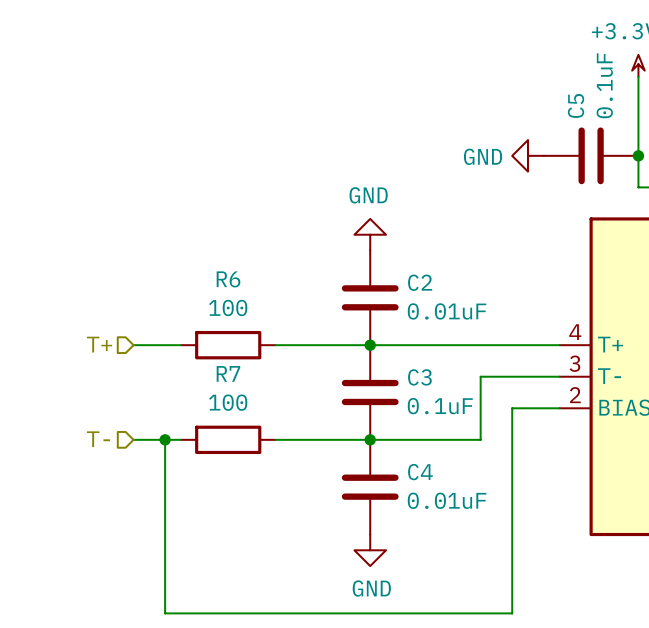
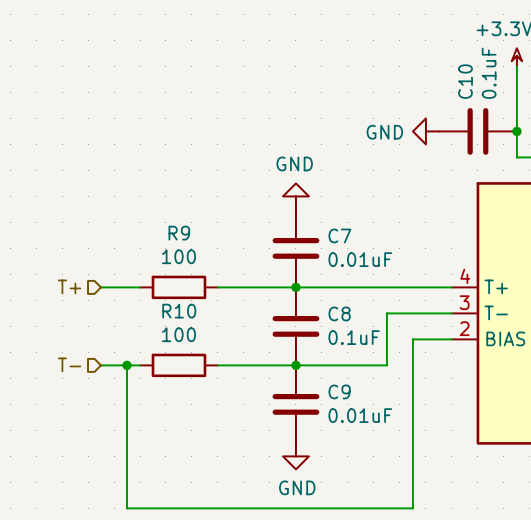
C5 name: C5 (576, 105) -> C10 (465, 81)
R6 name: R6 (228, 279) -> R9 (179, 233)
C2 name: C2 (420, 282) -> C7 (339, 235)
R7 name: R7 (228, 373) -> R10 (179, 311)
C3 name: C3 (419, 377) -> C8 (339, 313)
C4 name: C4 (420, 472) -> C9 (339, 391)

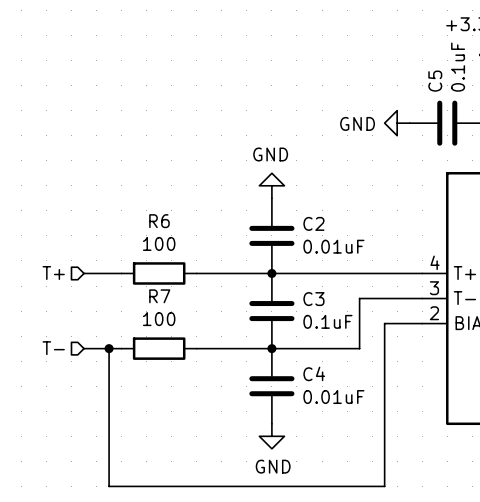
C10 name: C10 (465, 81) -> C5 (435, 81)
R9 name: R9 (179, 233) -> R6 (159, 221)
C7 name: C7 (339, 235) -> C2 (313, 223)
R10 name: R10 (179, 311) -> R7 (159, 296)
C8 name: C8 (339, 313) -> C3 (313, 299)
C9 name: C9 (339, 391) -> C4 (314, 373)

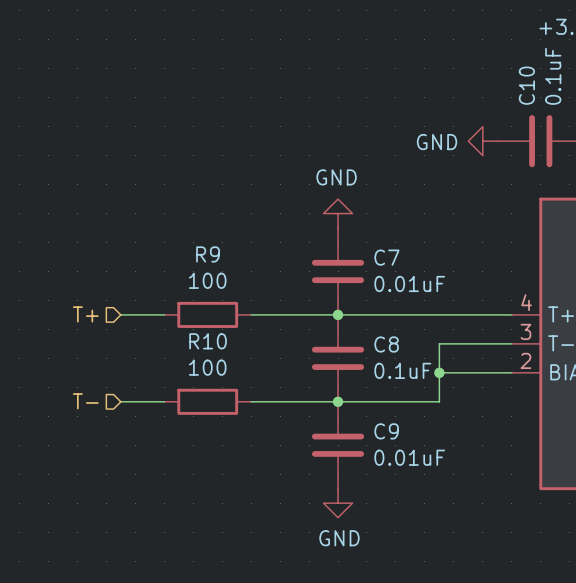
C5 name: C5 (435, 81) -> C10 (526, 85)
R6 name: R6 (159, 221) -> R9 (208, 254)
C2 name: C2 (313, 223) -> C7 (386, 257)
R7 name: R7 (159, 296) -> R10 (208, 341)
C3 name: C3 (313, 299) -> C8 (386, 344)
junction: none -> (439, 372)
wire: (384, 323) (384, 486) (109, 486) (109, 348) -> (468, 372) (439, 372)
junction: (109, 348) -> none
C4 name: C4 (314, 373) -> C9 (386, 431)

